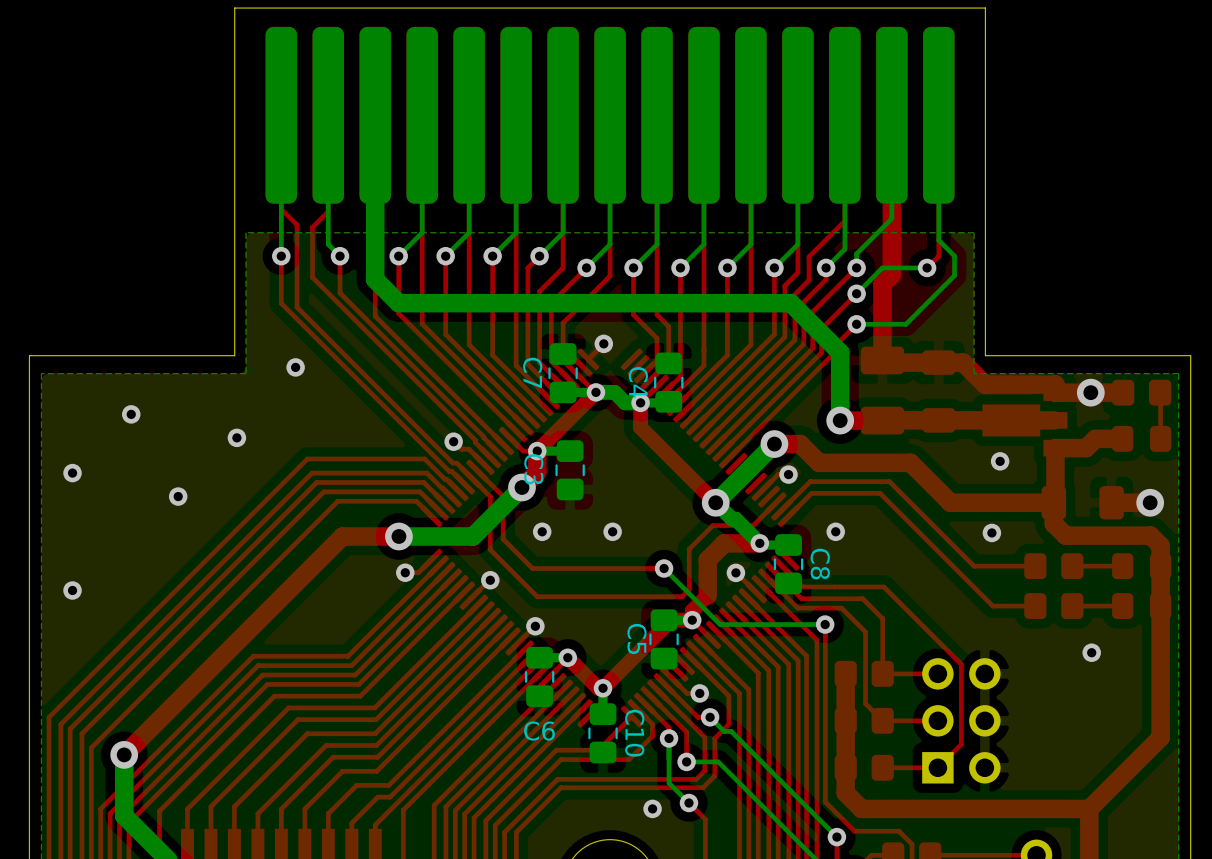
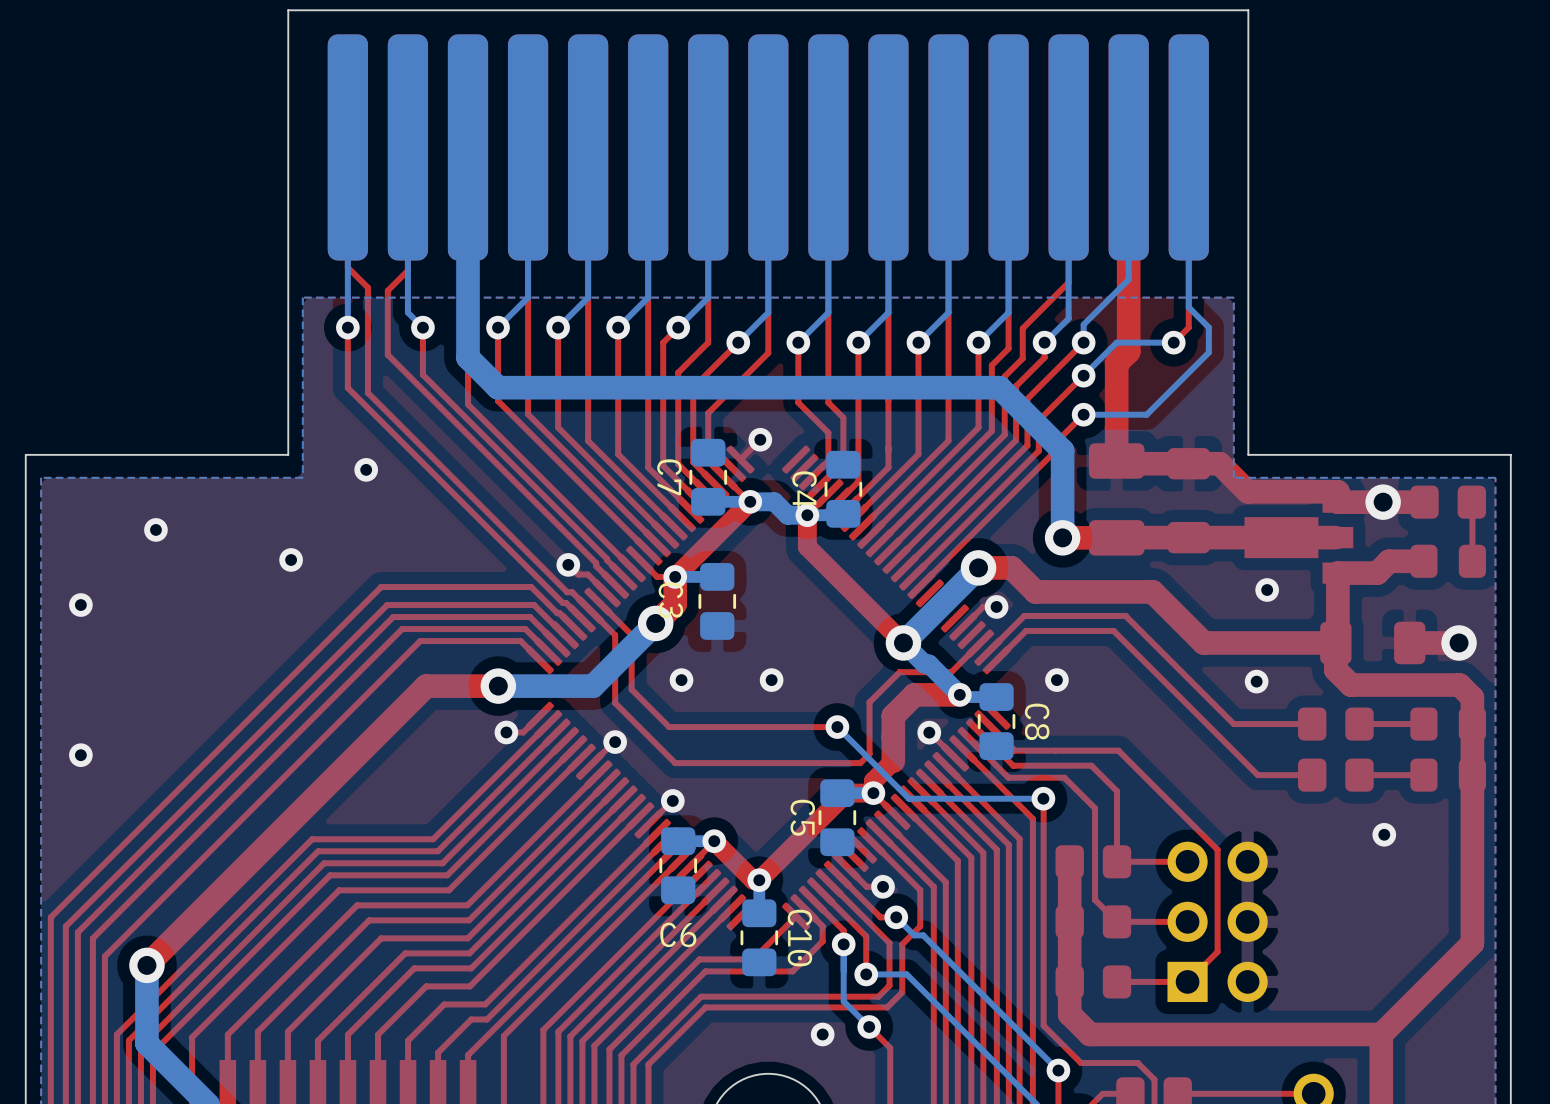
via: (178, 496) -> none

